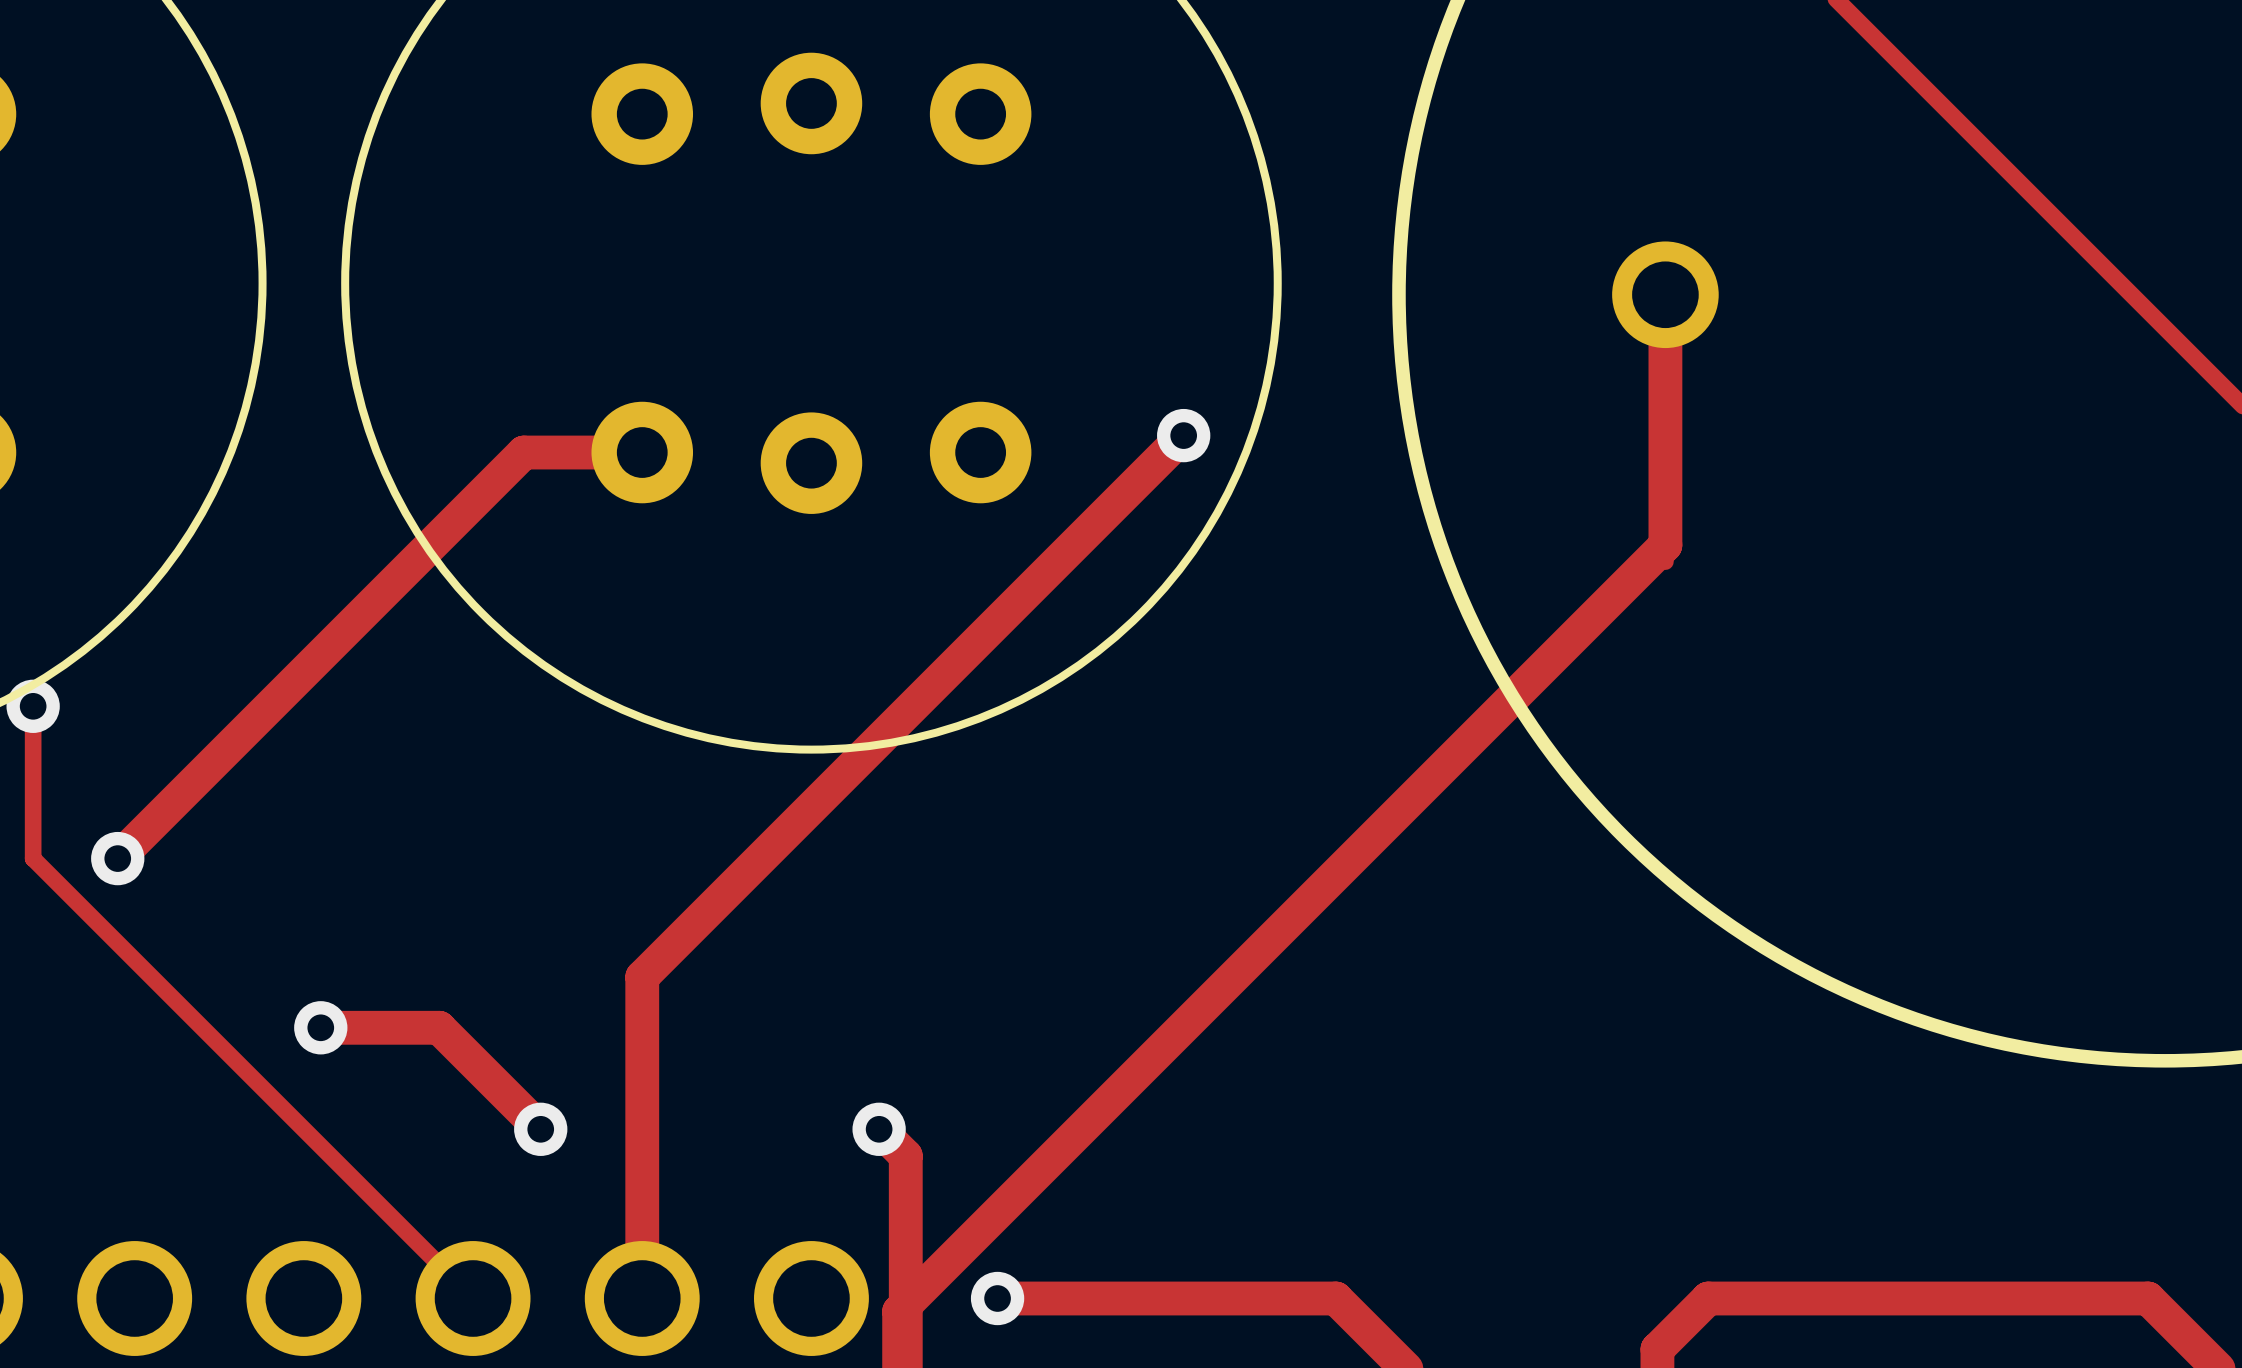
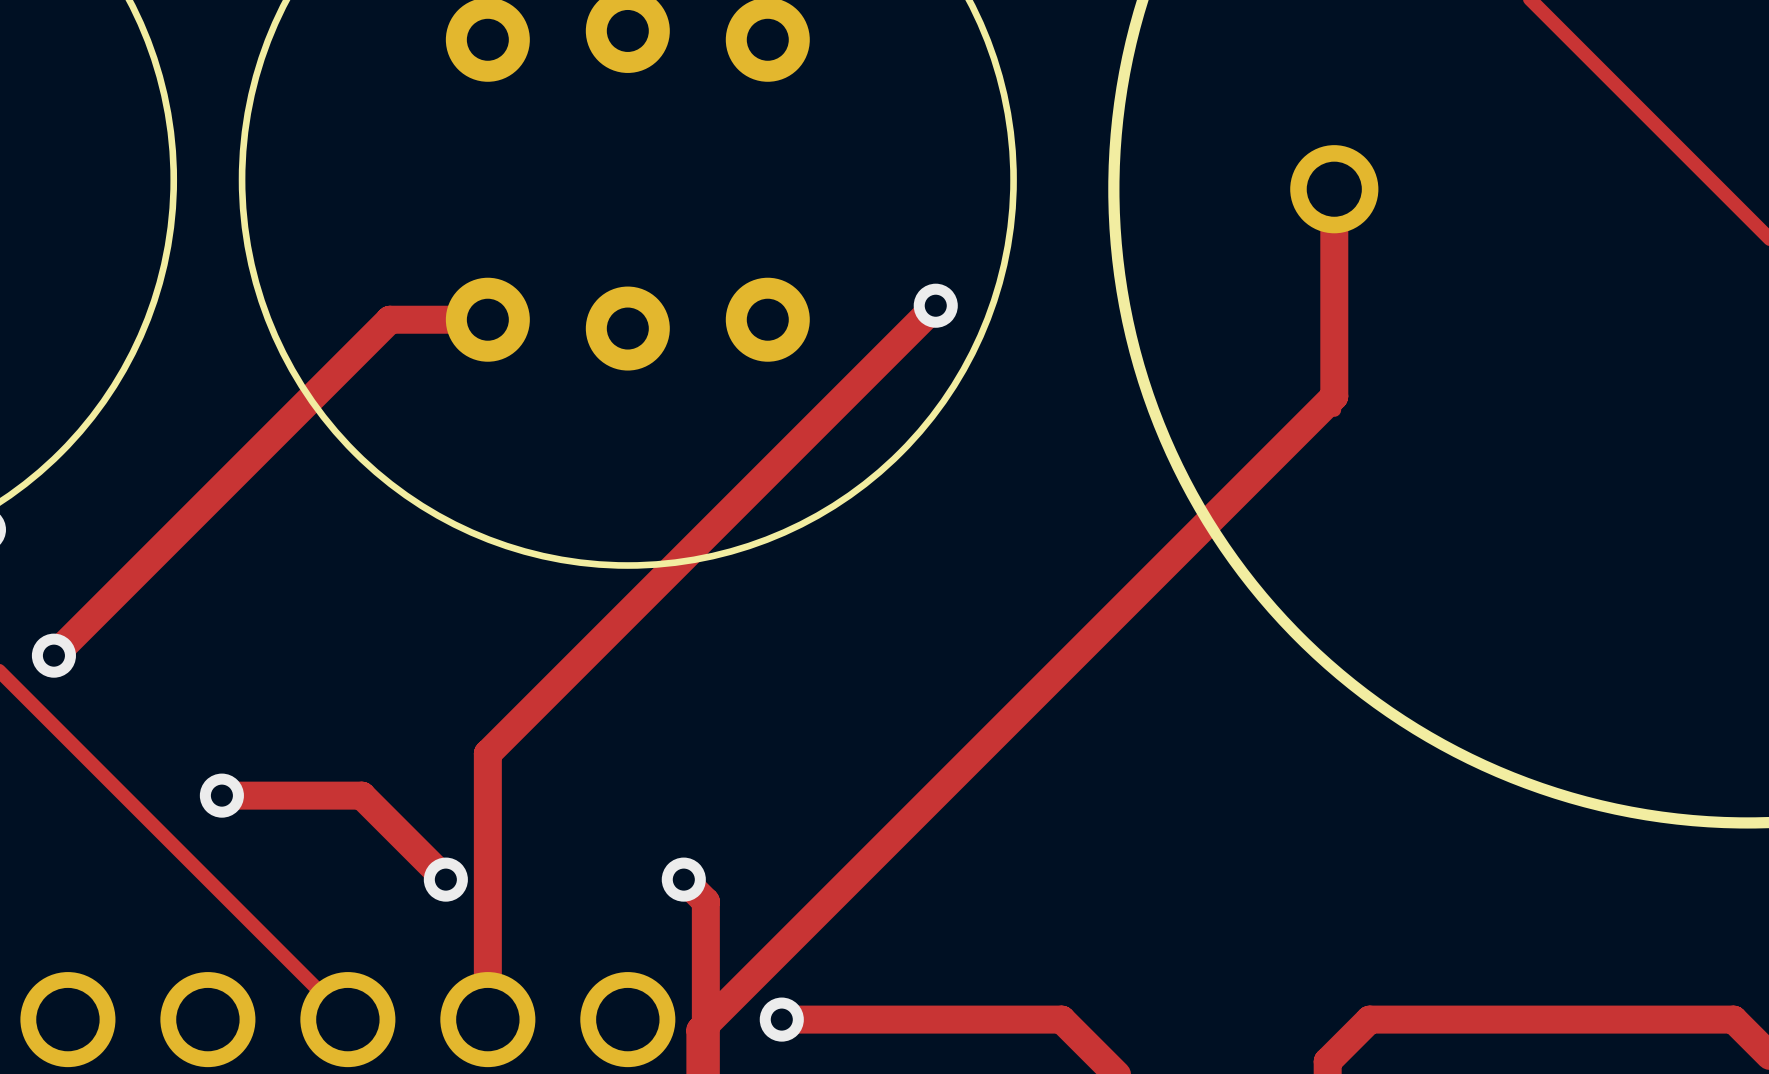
track: (439, 1027) (540, 1129) -> (319, 795) (361, 795) (445, 879)
via position: (540, 1129) -> (445, 879)

